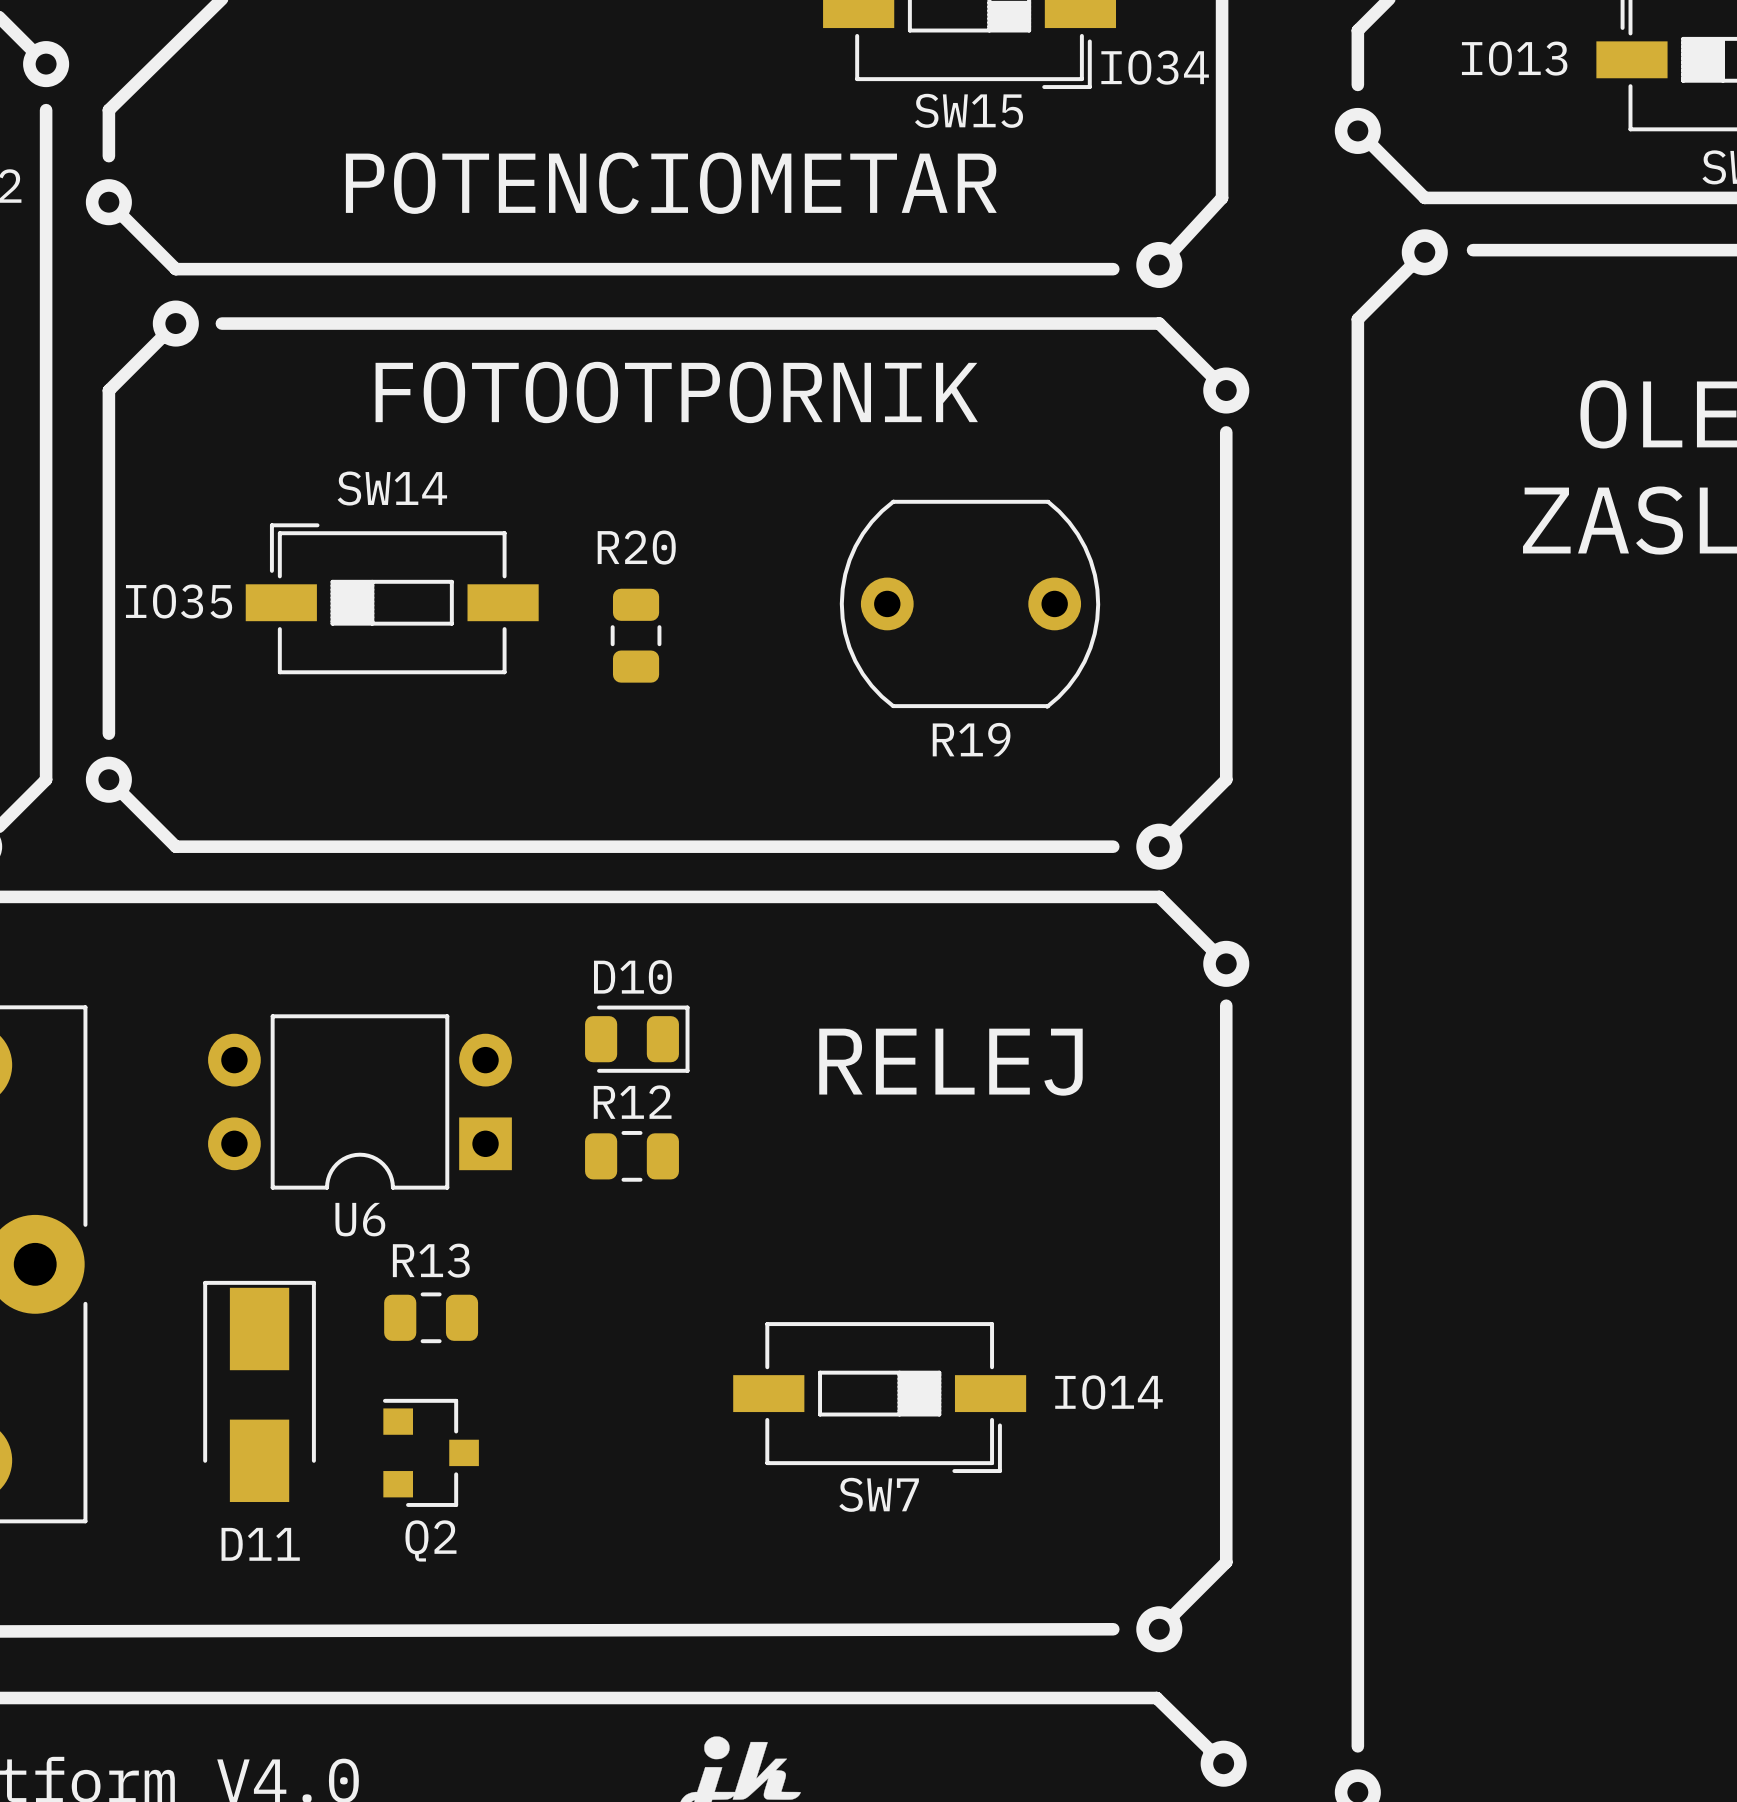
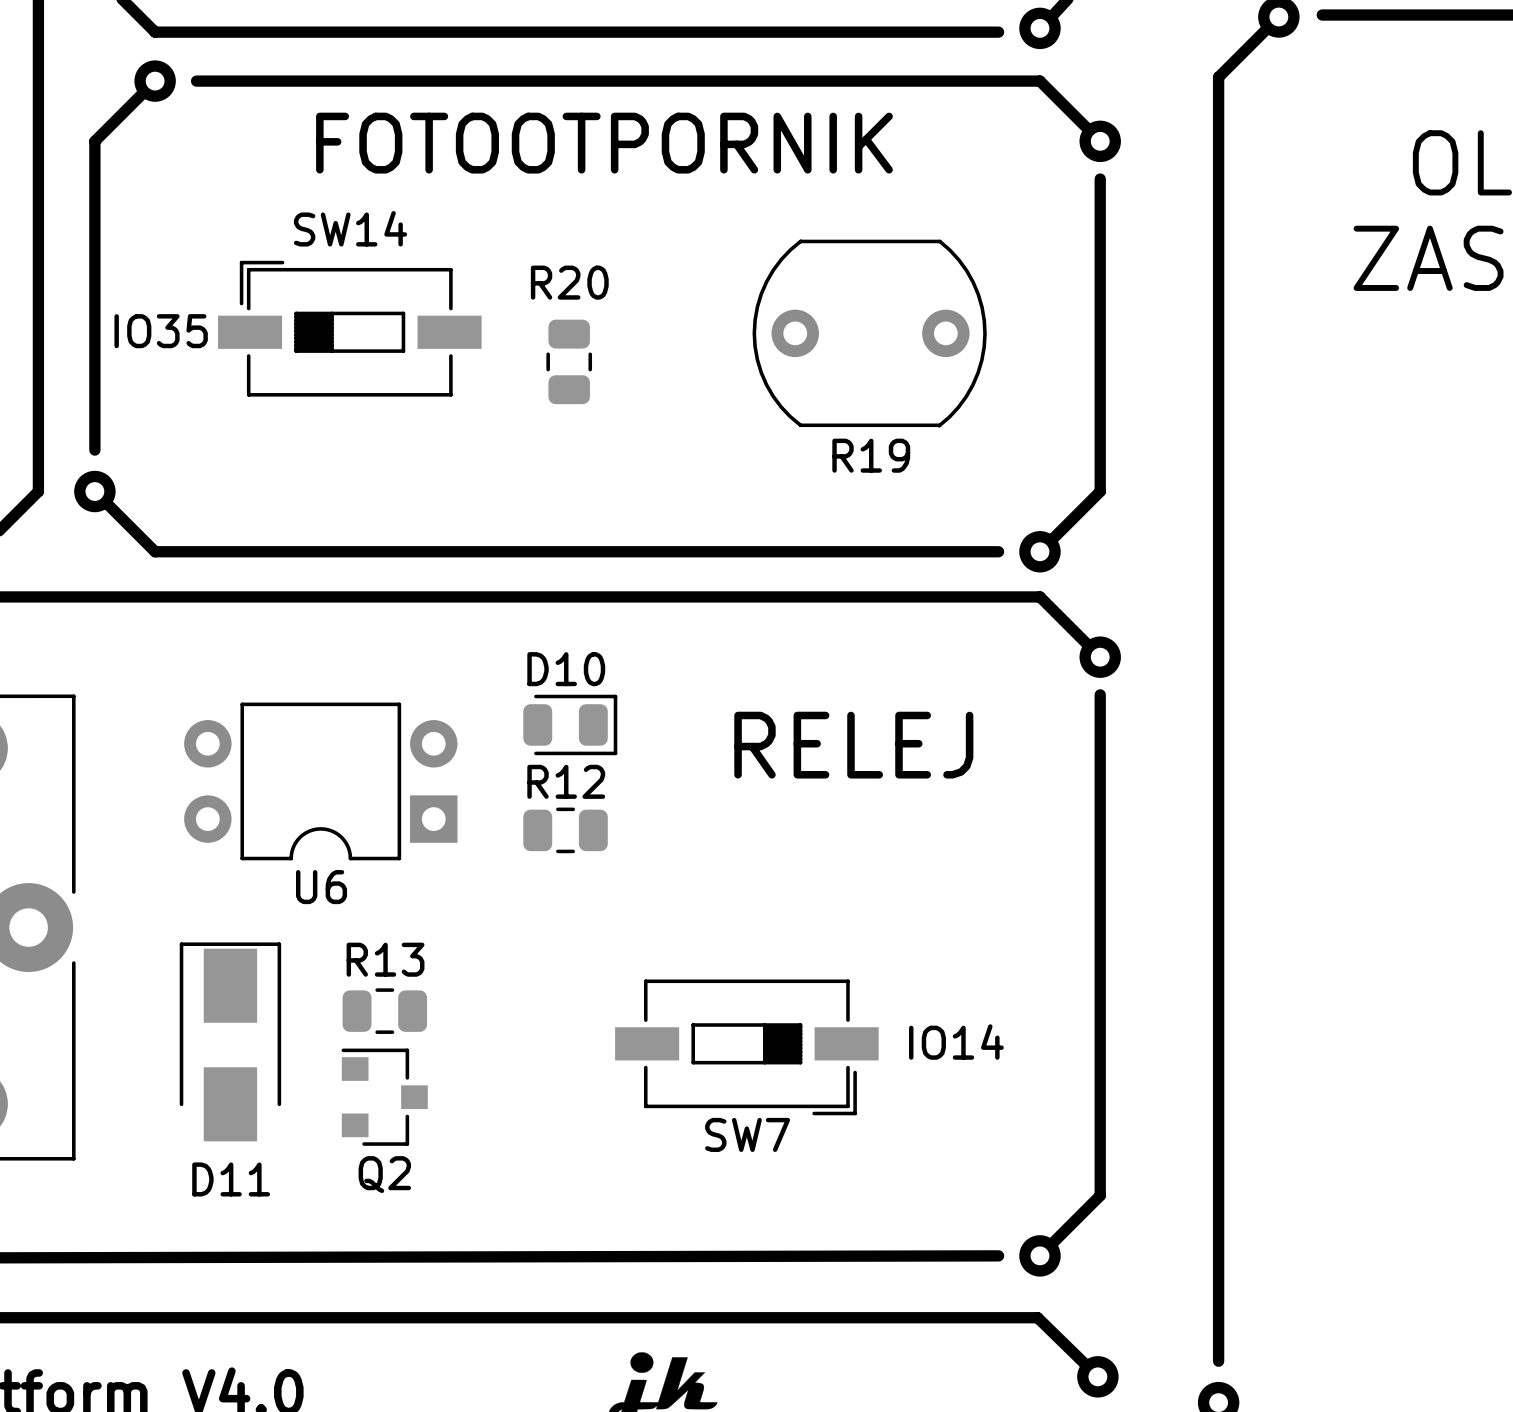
R13 position: (431, 1317) -> (384, 1011)
text position: IO14 (1108, 1392) -> IO14 (956, 1042)
SW7 position: (879, 1397) -> (746, 1047)

